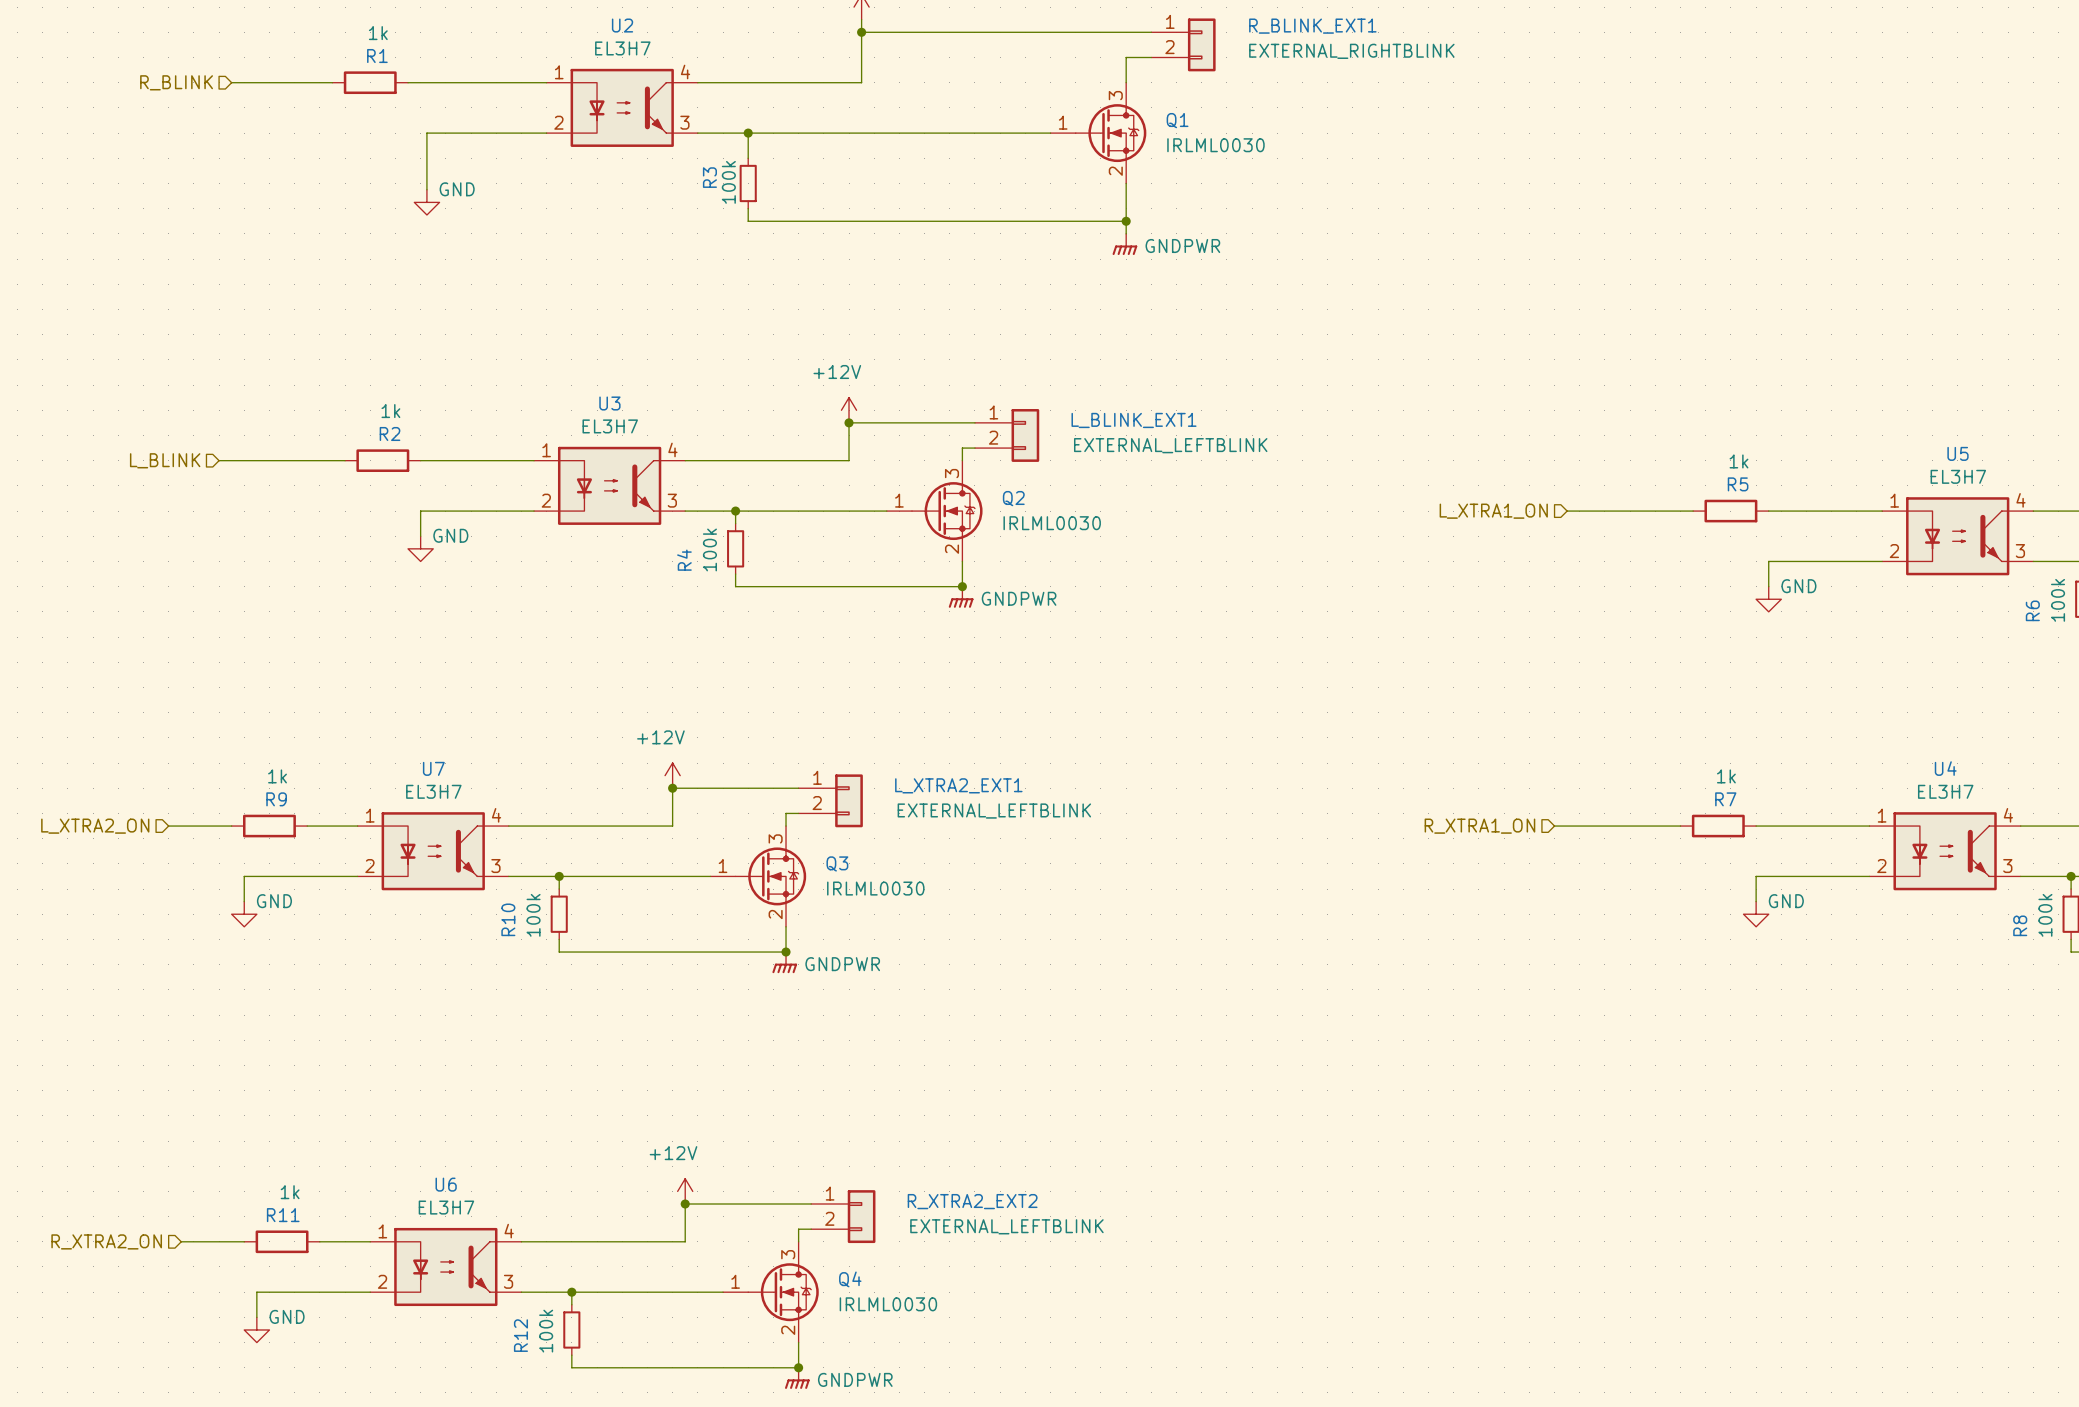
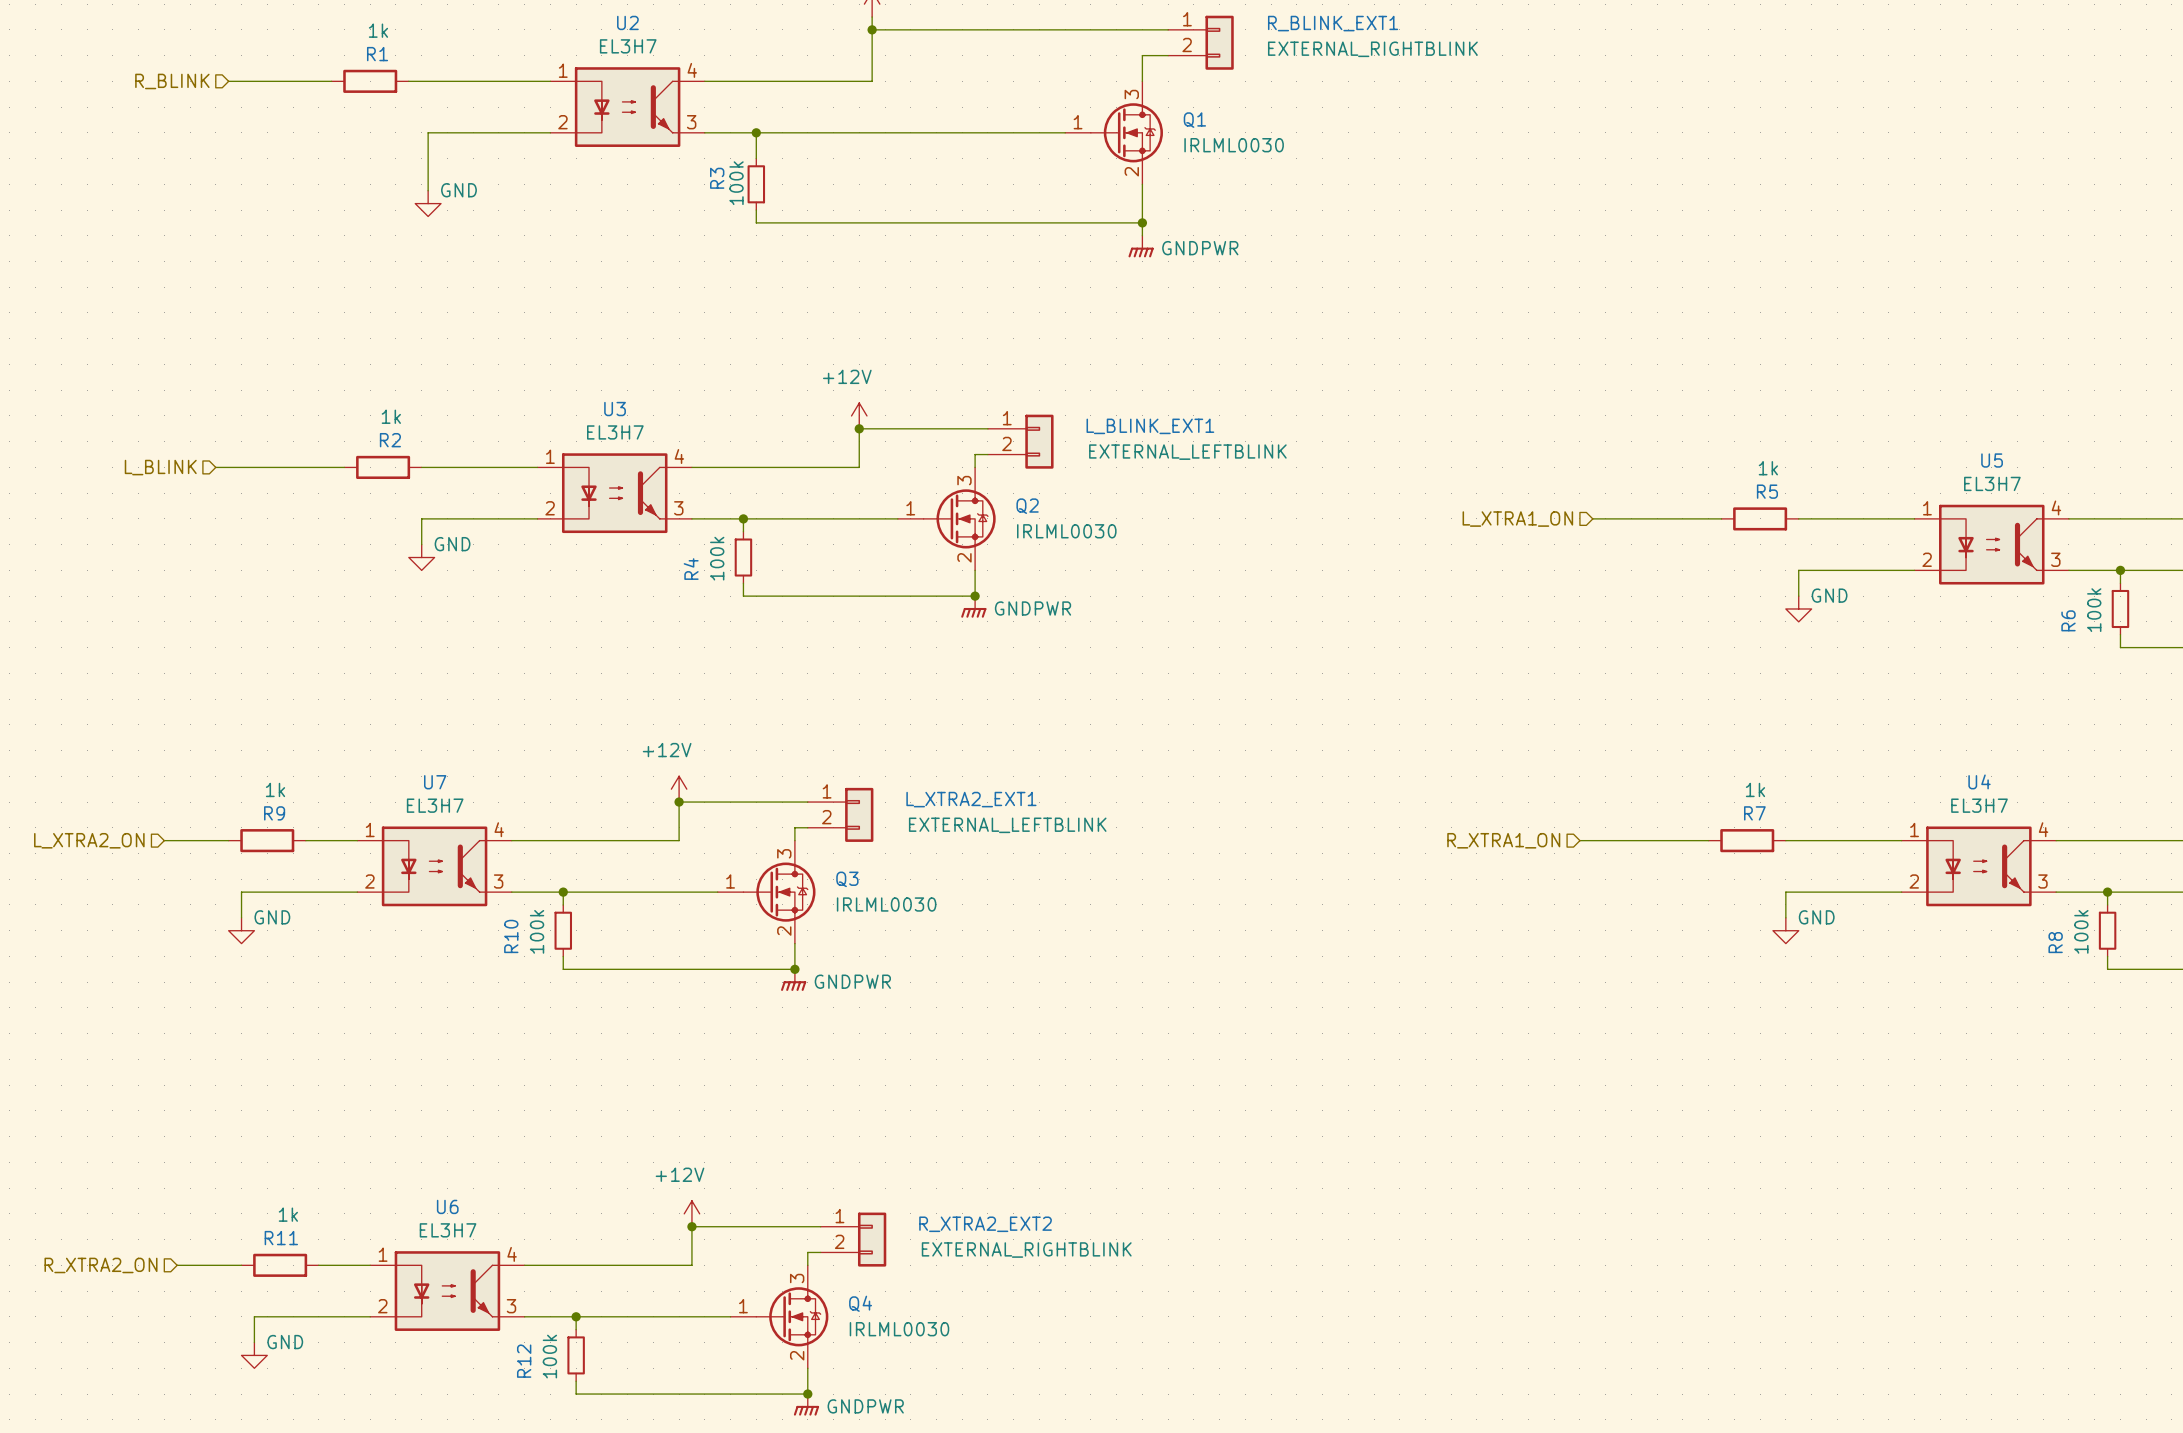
R_XTRA2_EXT2 value: EXTERNAL_LEFTBLINK (1006, 1226) -> EXTERNAL_RIGHTBLINK (1026, 1250)

